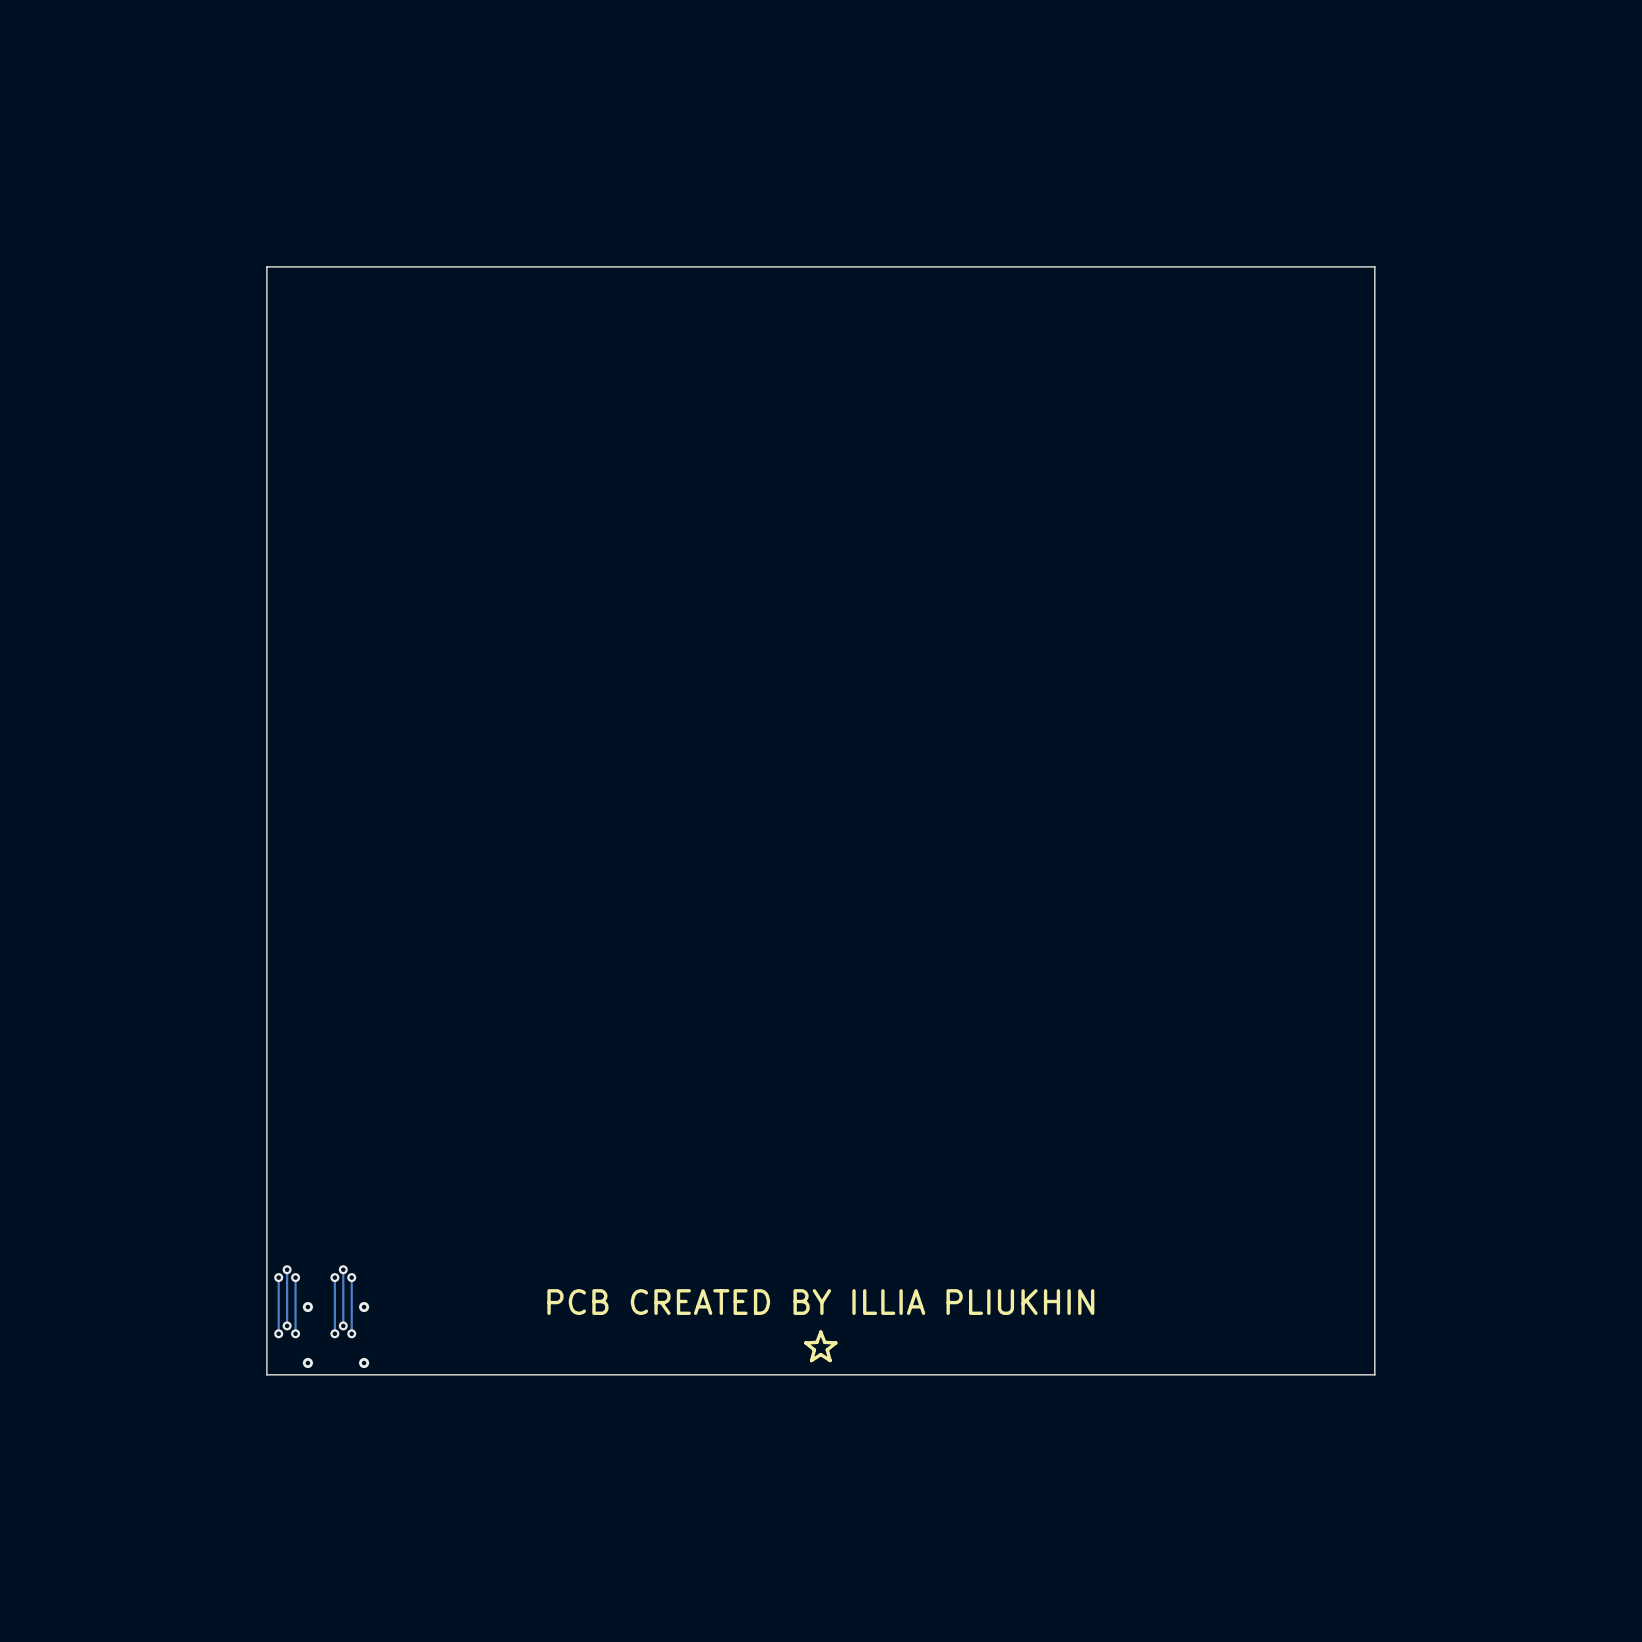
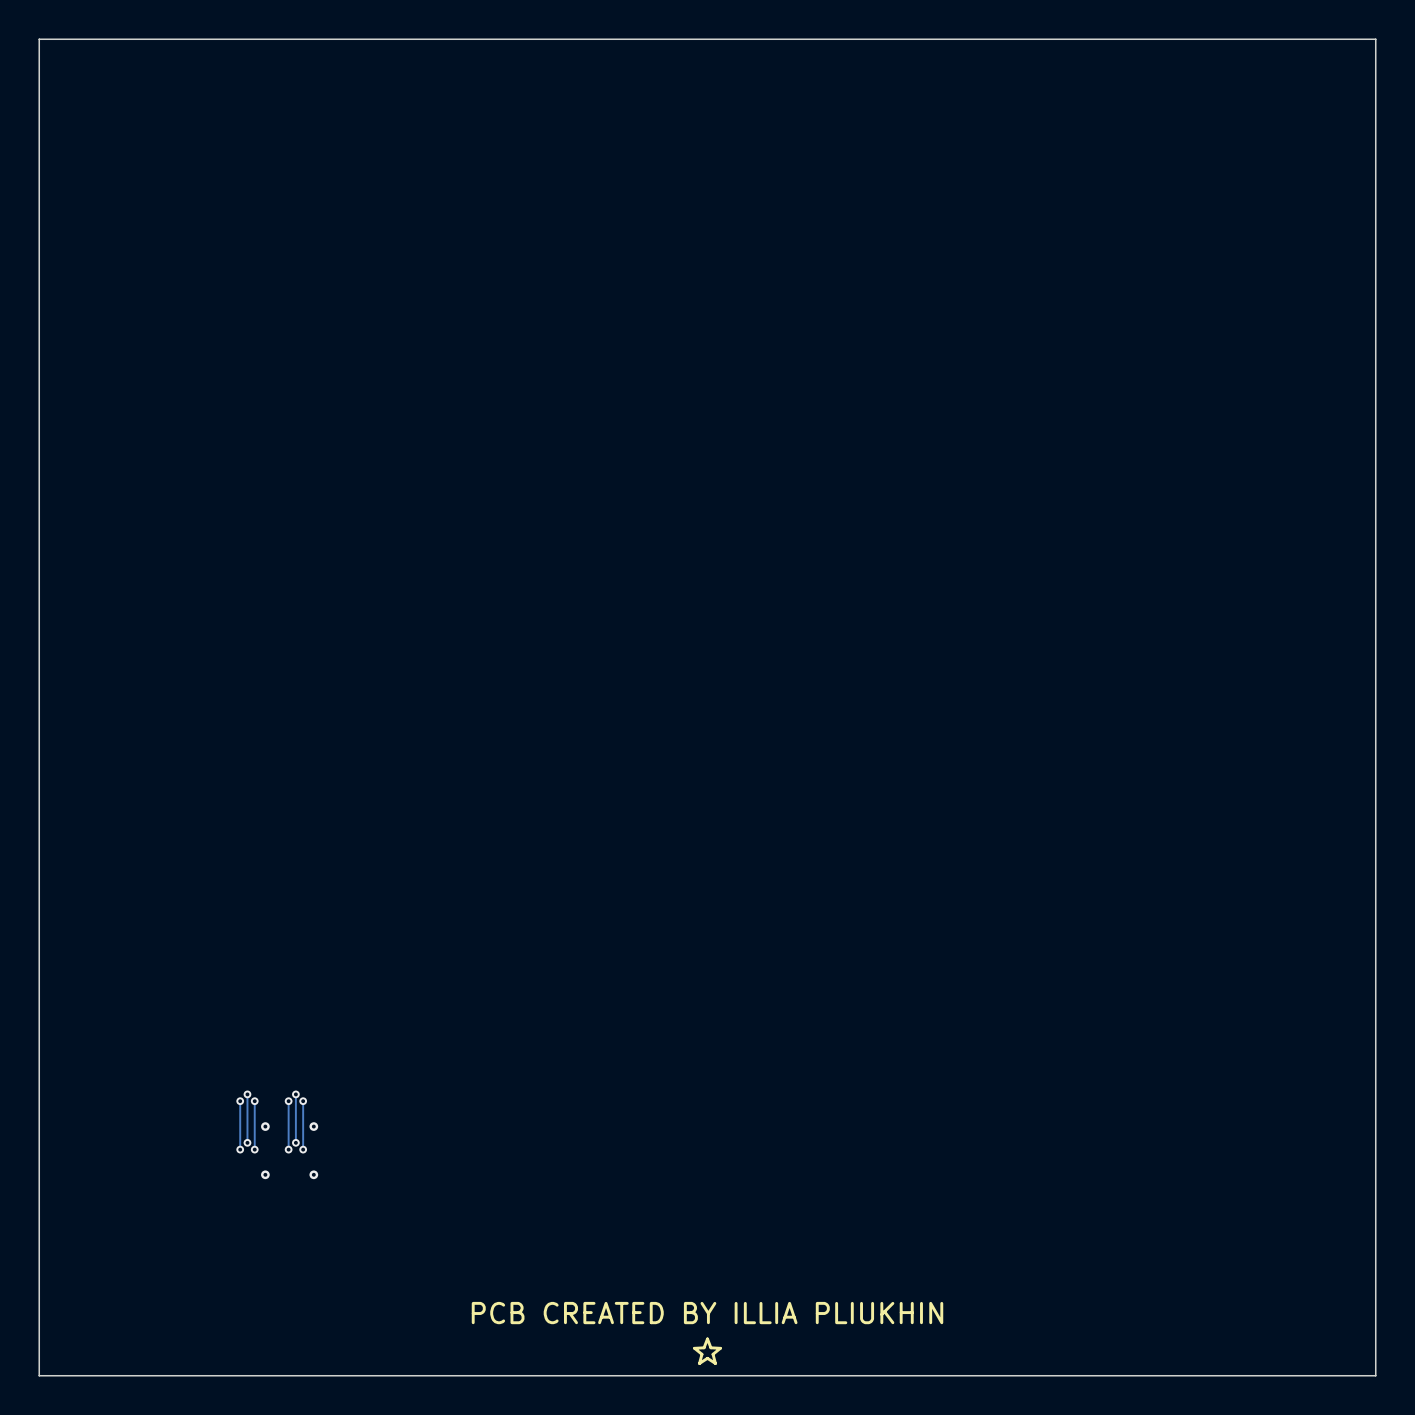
board edge: (1374, 266) (266, 266) (266, 1374) (1374, 1374) (1374, 266) -> (1375, 39) (1375, 1375) (39, 1375) (39, 39) (1375, 39)
text position: PCB CREATED BY ILLIA PLIUKHIN (820, 1302) -> PCB CREATED BY ILLIA PLIUKHIN (707, 1313)
line: (820, 1332) (824, 1342) (835, 1342) (827, 1349) (830, 1360) (820, 1354) (811, 1360) (814, 1349) (805, 1342) (816, 1342) (820, 1332) -> (707, 1338) (710, 1347) (720, 1348) (713, 1354) (715, 1363) (707, 1358) (699, 1363) (701, 1354) (694, 1348) (704, 1347) (707, 1338)

